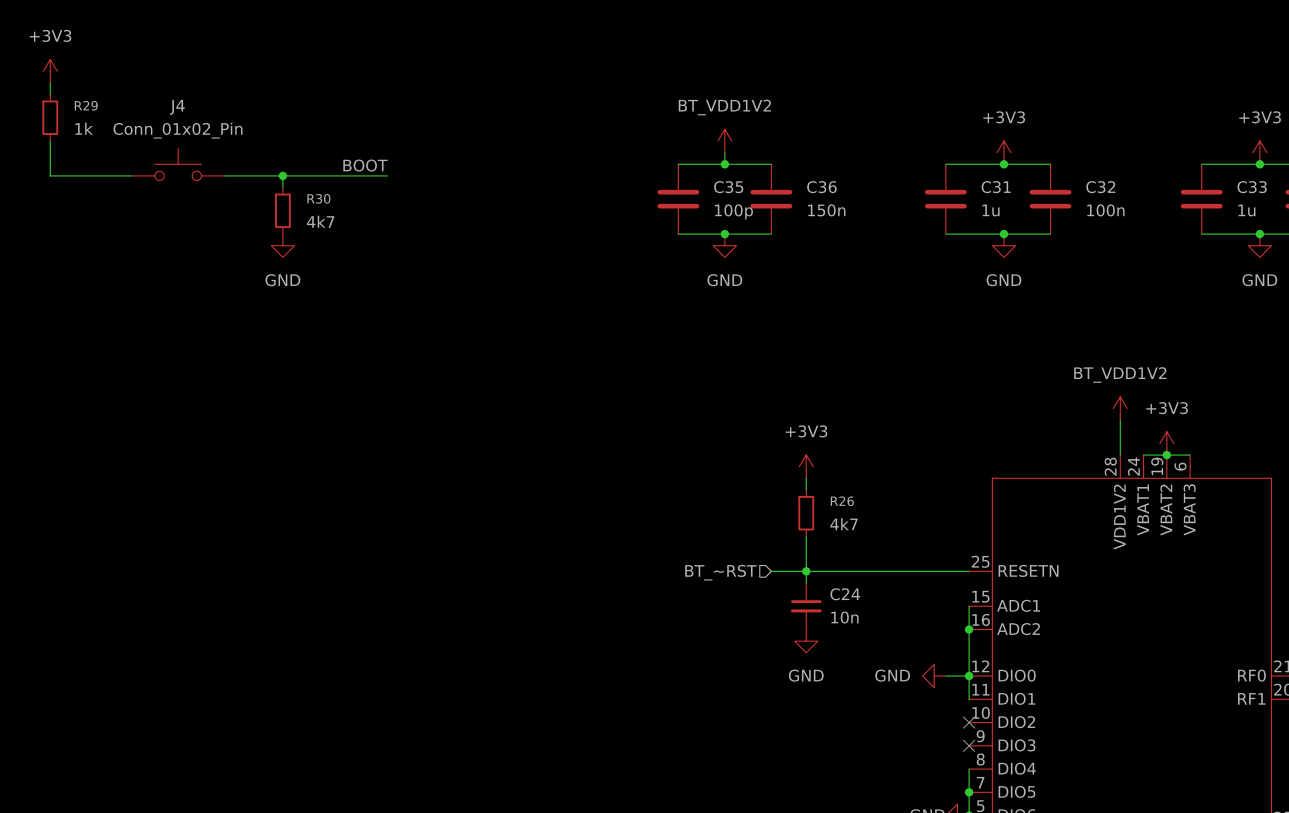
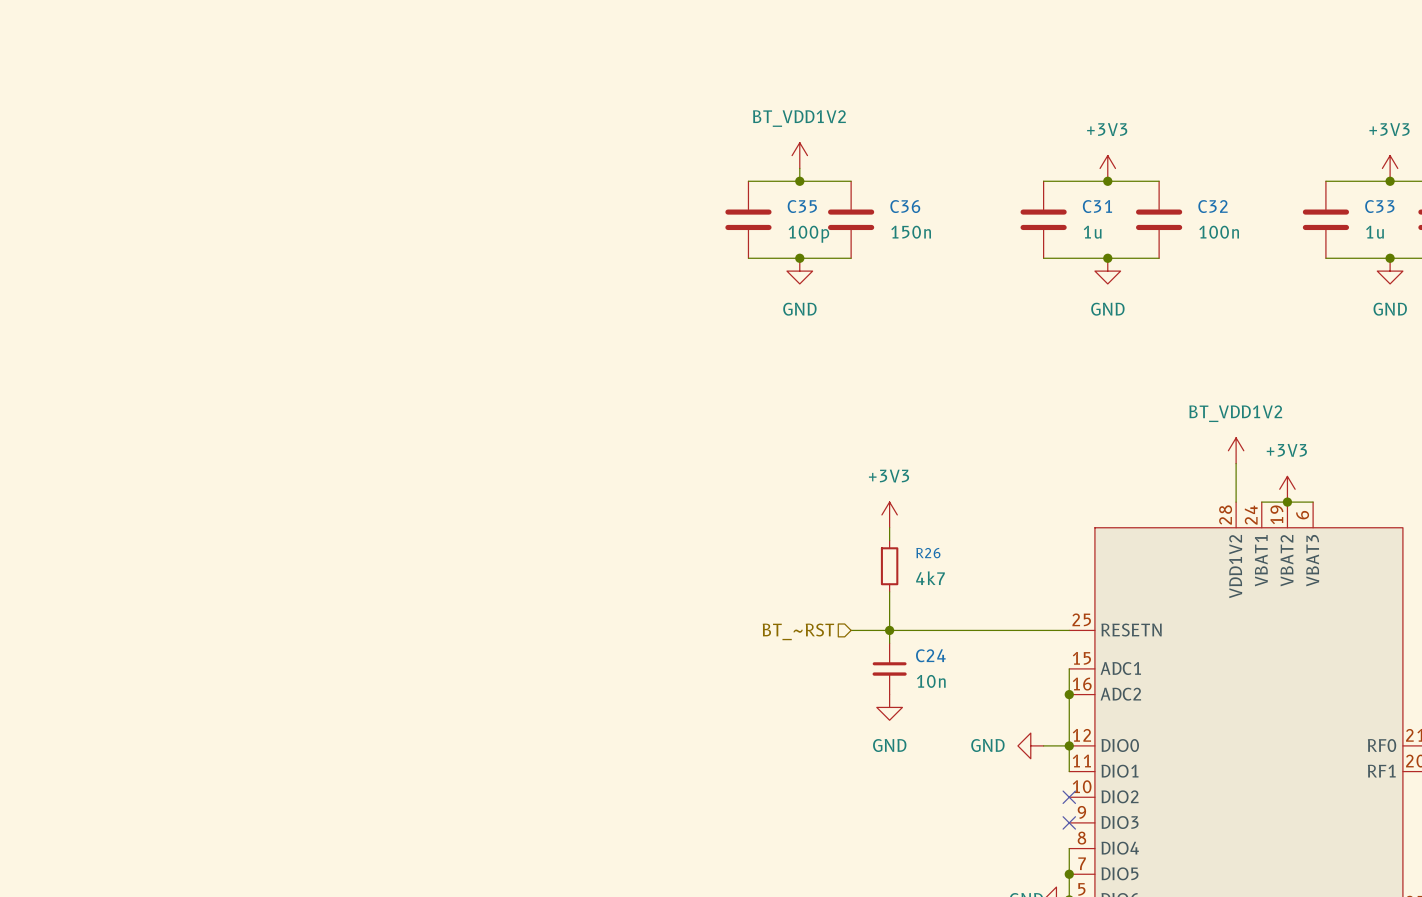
power symbol: +3V3 (50, 71) -> none
wire: (50, 82) (50, 94) -> none
R29: 1k (50, 117) -> none
wire: (50, 141) (50, 175) (131, 175) -> none
J4: Conn_01x02_Pin (178, 164) -> none
label: BOOT (365, 165) -> none
wire: (224, 175) (387, 175) -> none
wire: (282, 175) (282, 187) -> none
junction: (282, 175) -> none
R30: 4k7 (282, 210) -> none
power symbol: GND (282, 245) -> none

